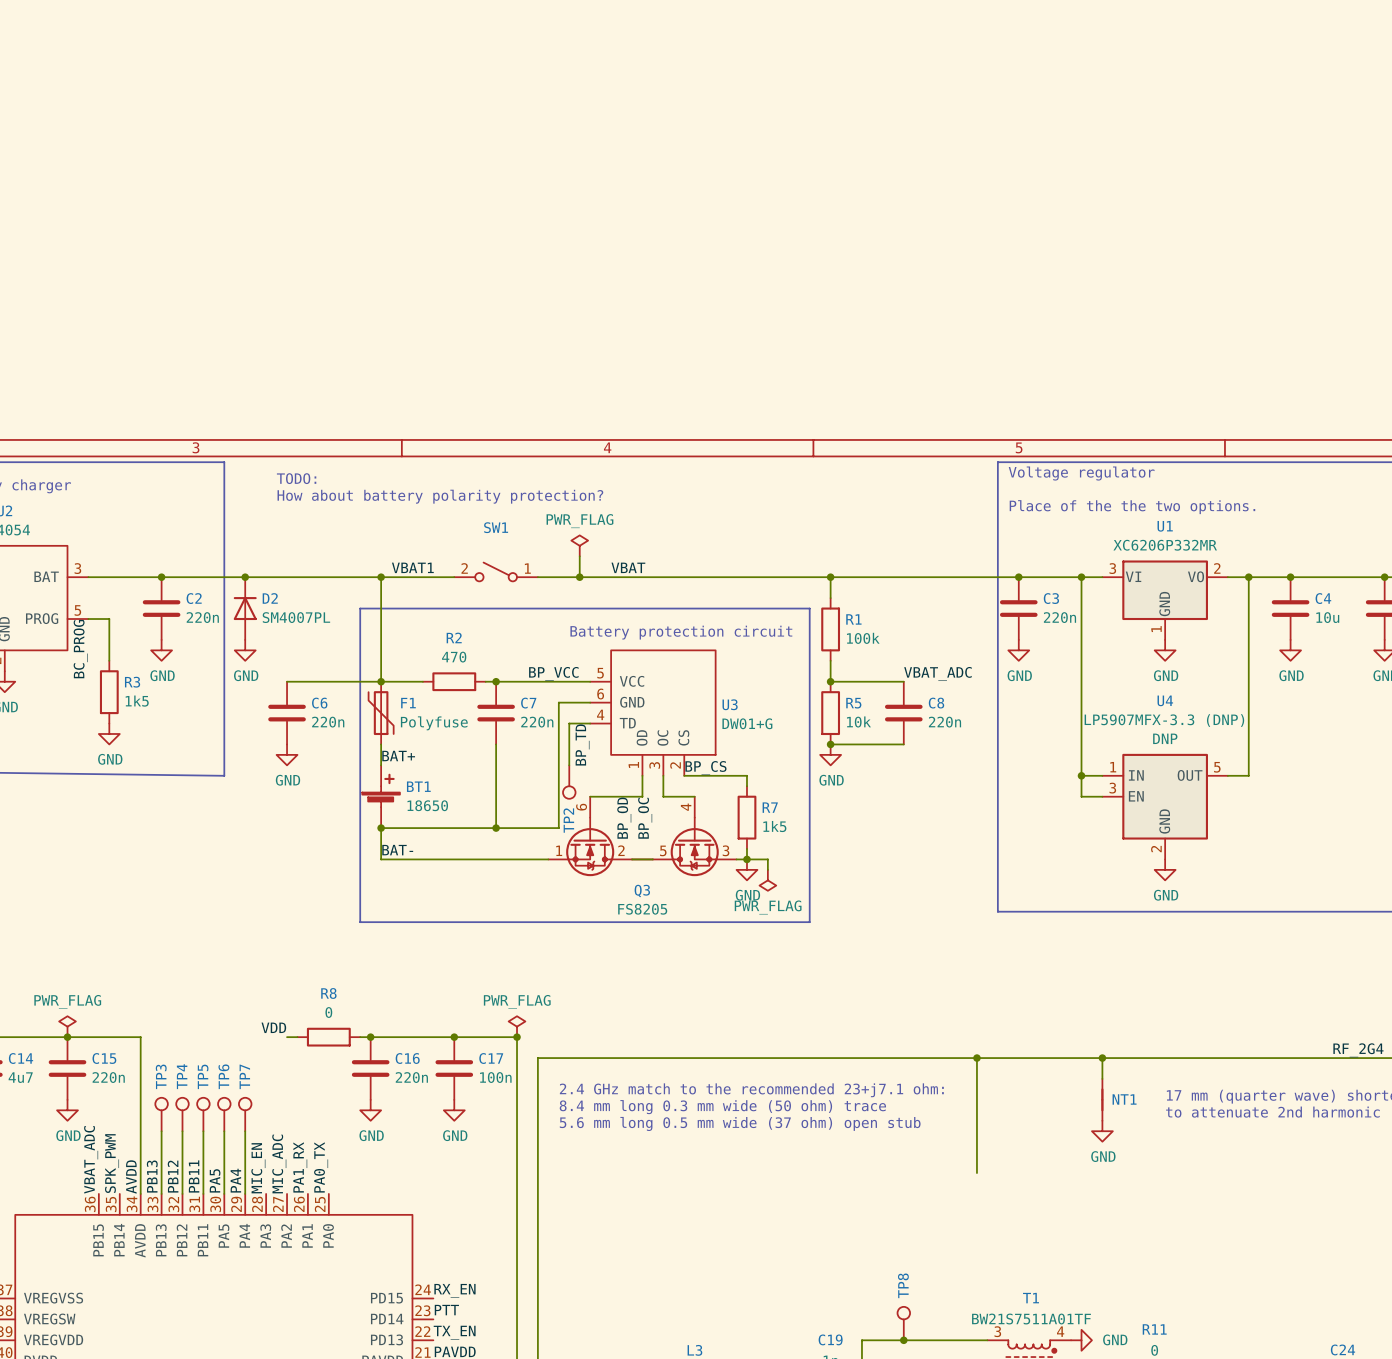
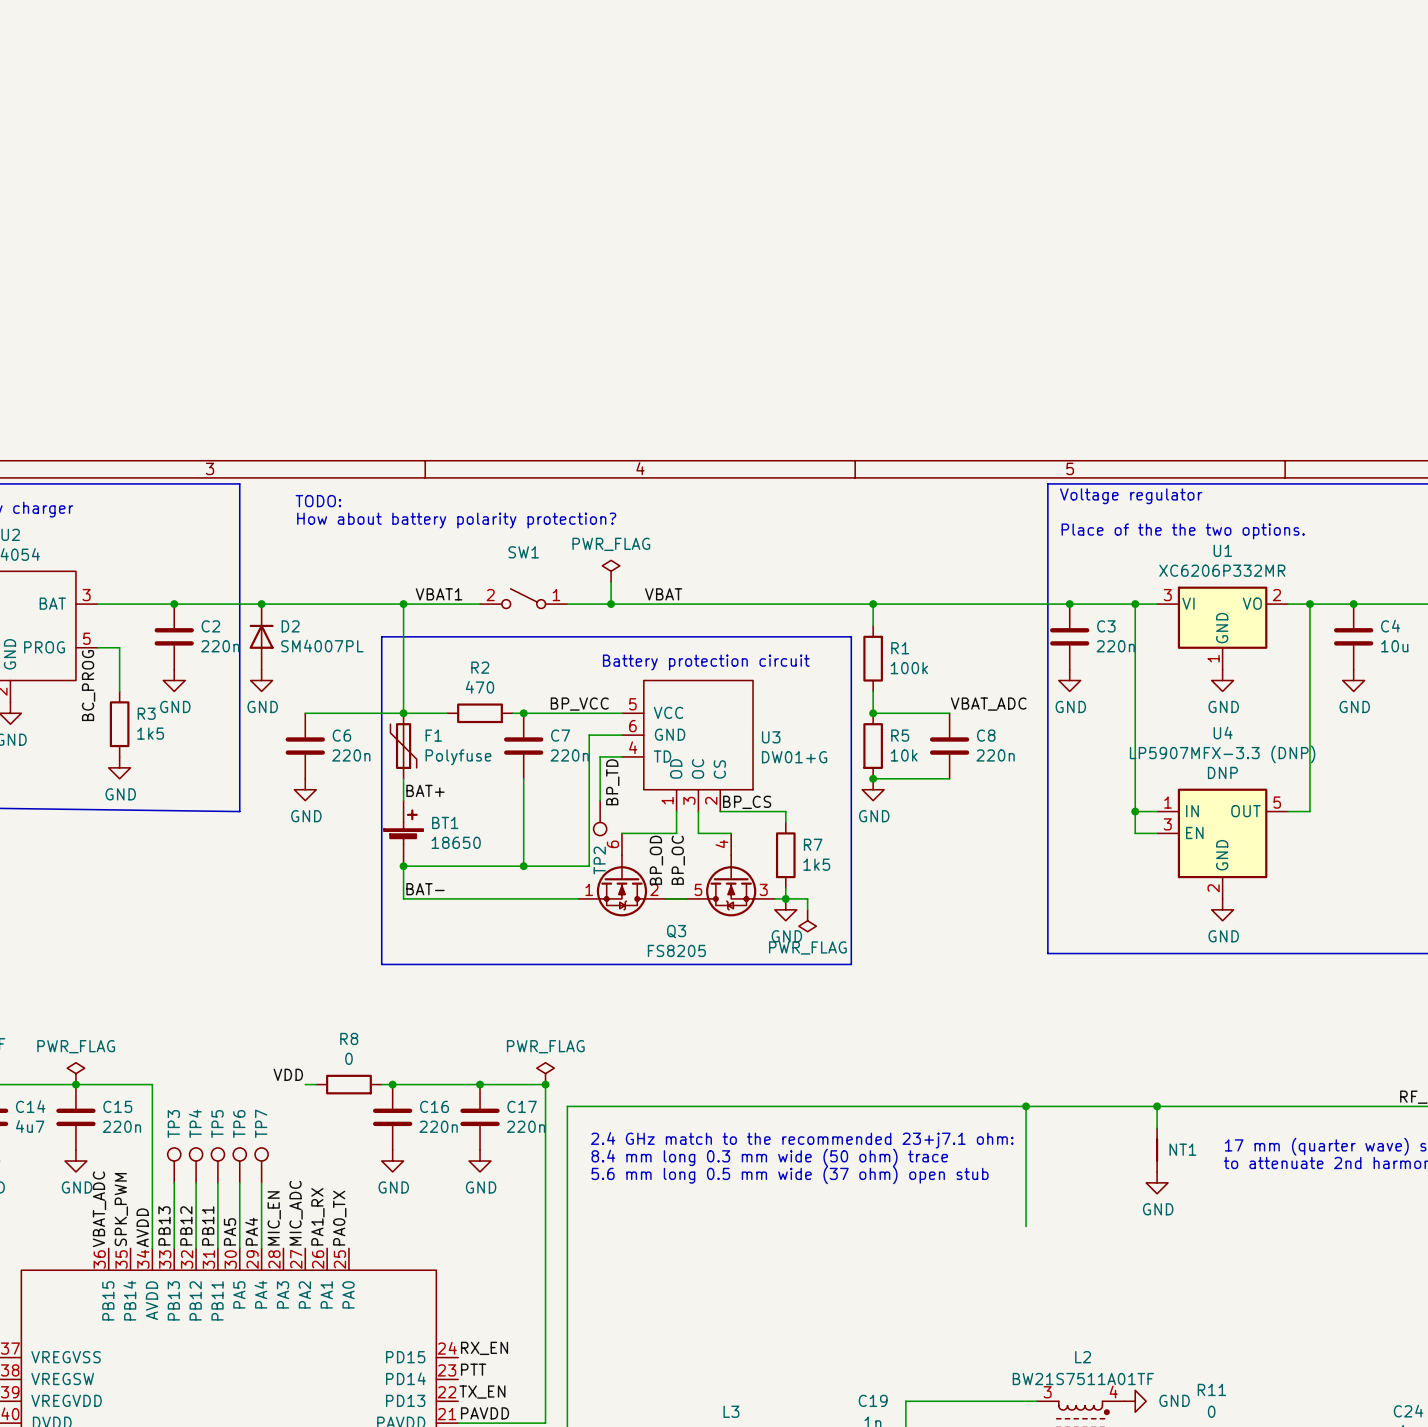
C17 value: 100n (495, 1077) -> 220n (526, 1126)
T1 name: T1 (1031, 1298) -> L2 (1083, 1357)
TP8: (903, 1323) -> none
junction: (903, 1340) -> none

